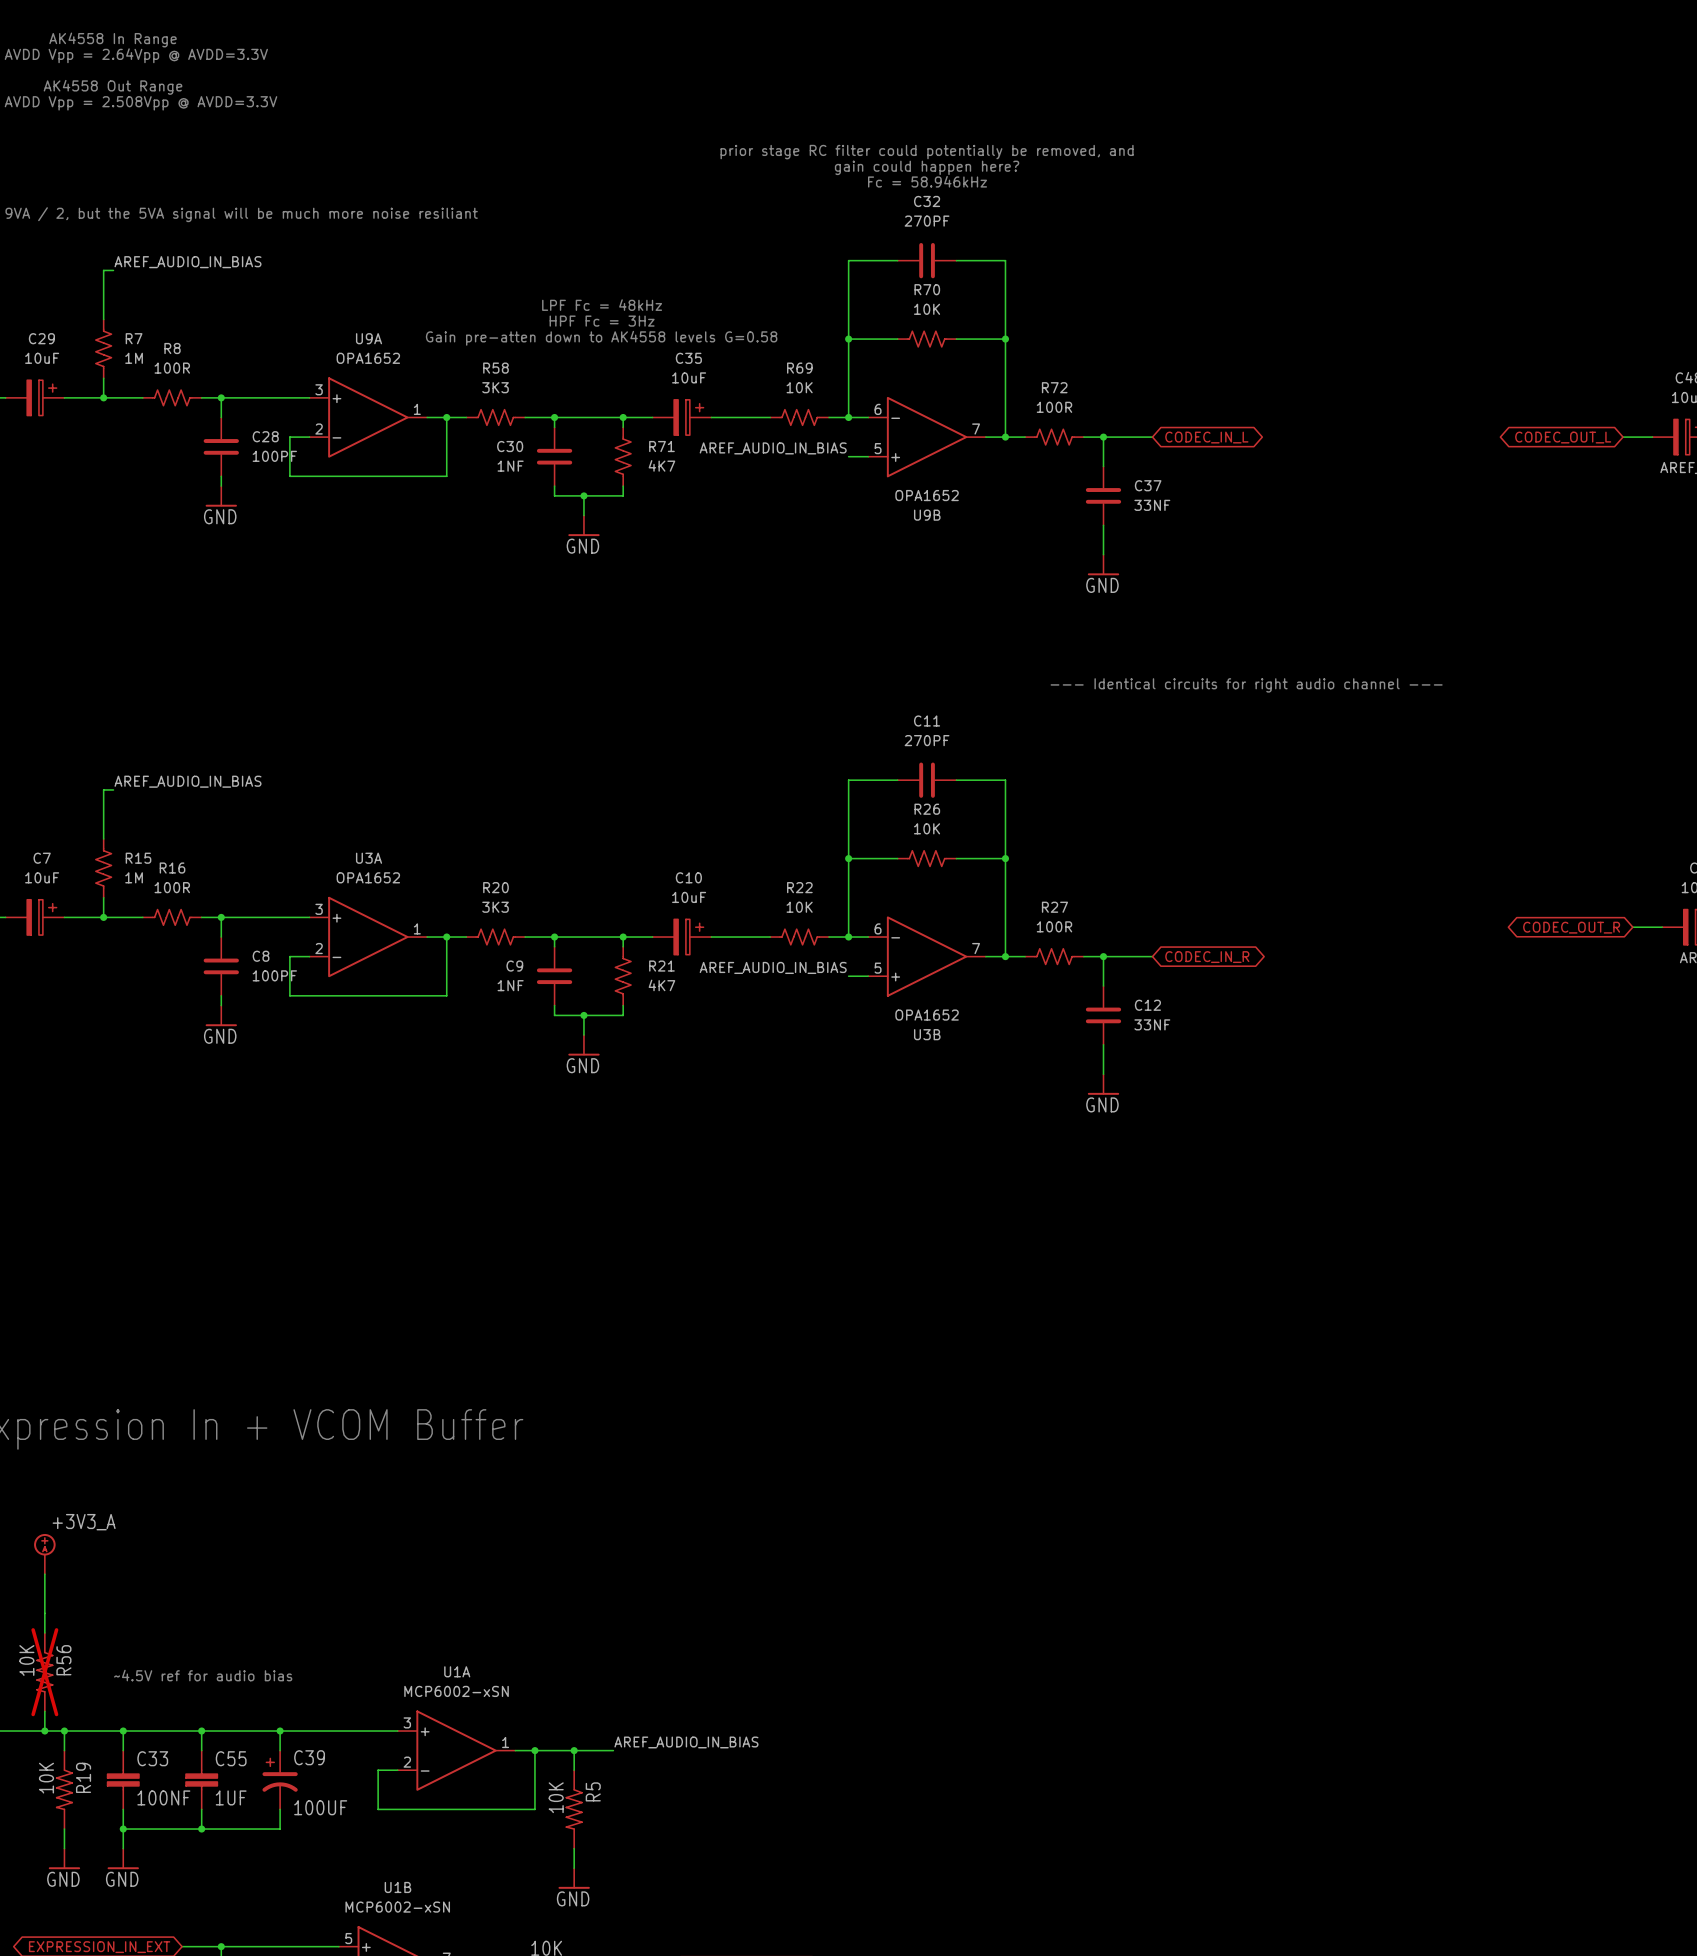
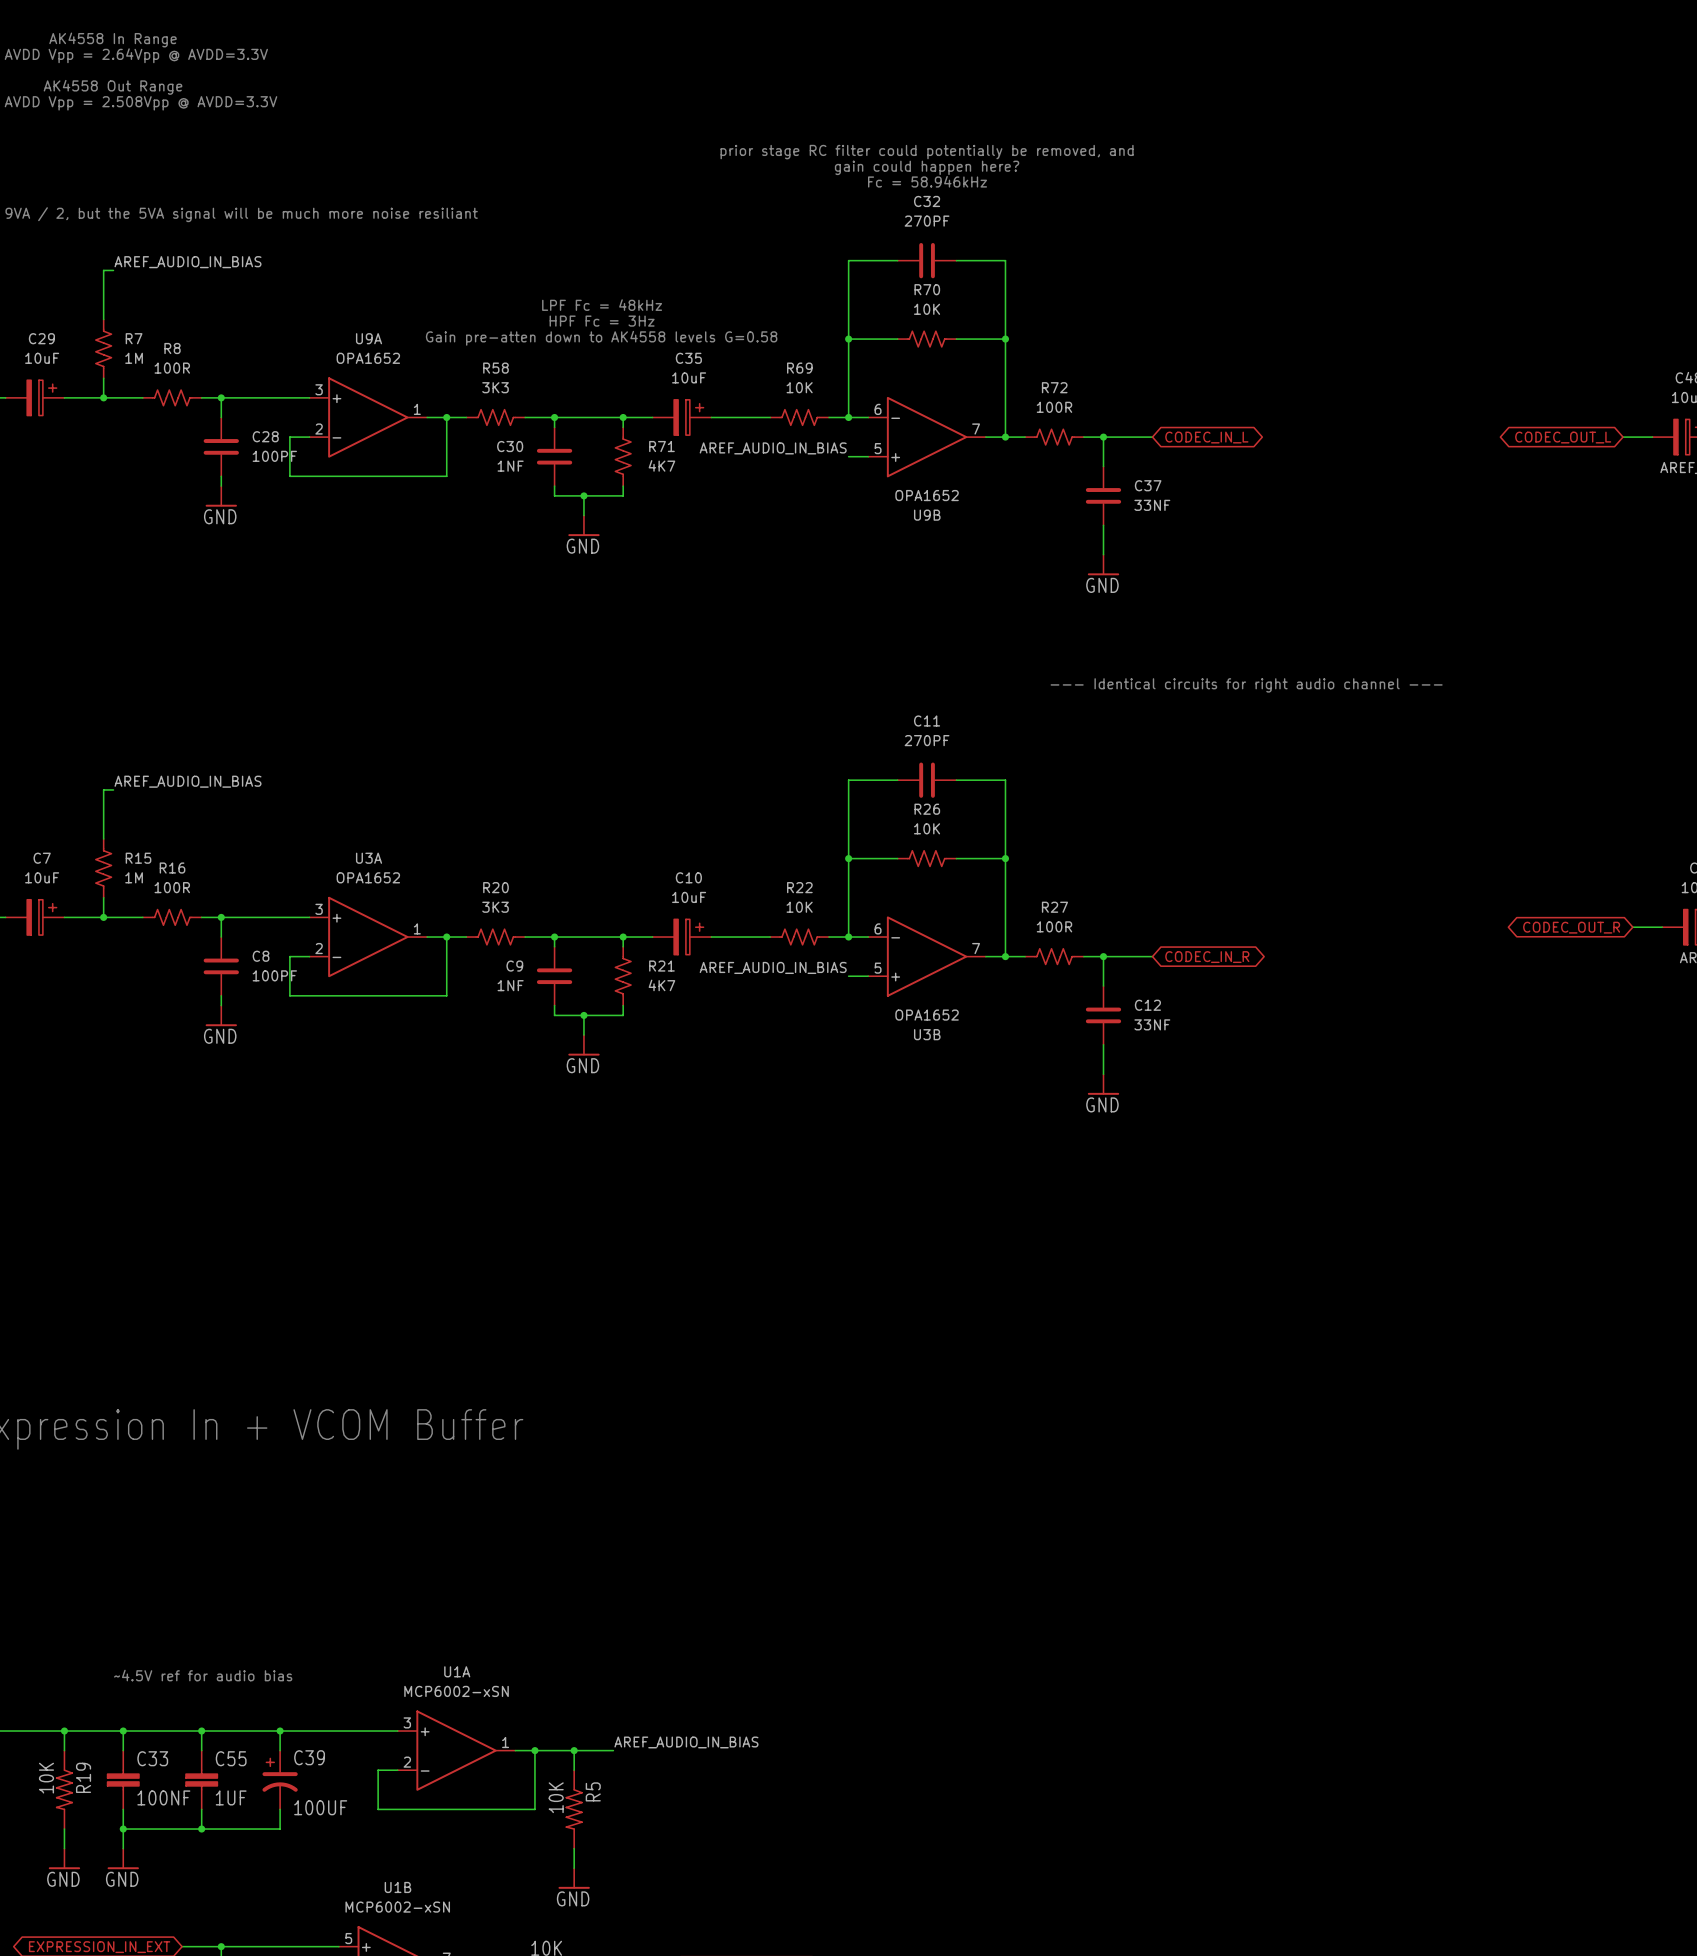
power symbol: +3V3_A (44, 1554) -> none
wire: (44, 1574) (44, 1632) -> none
R56: 10K (44, 1672) -> none
wire: (44, 1711) (44, 1731) -> none
junction: (44, 1731) -> none

